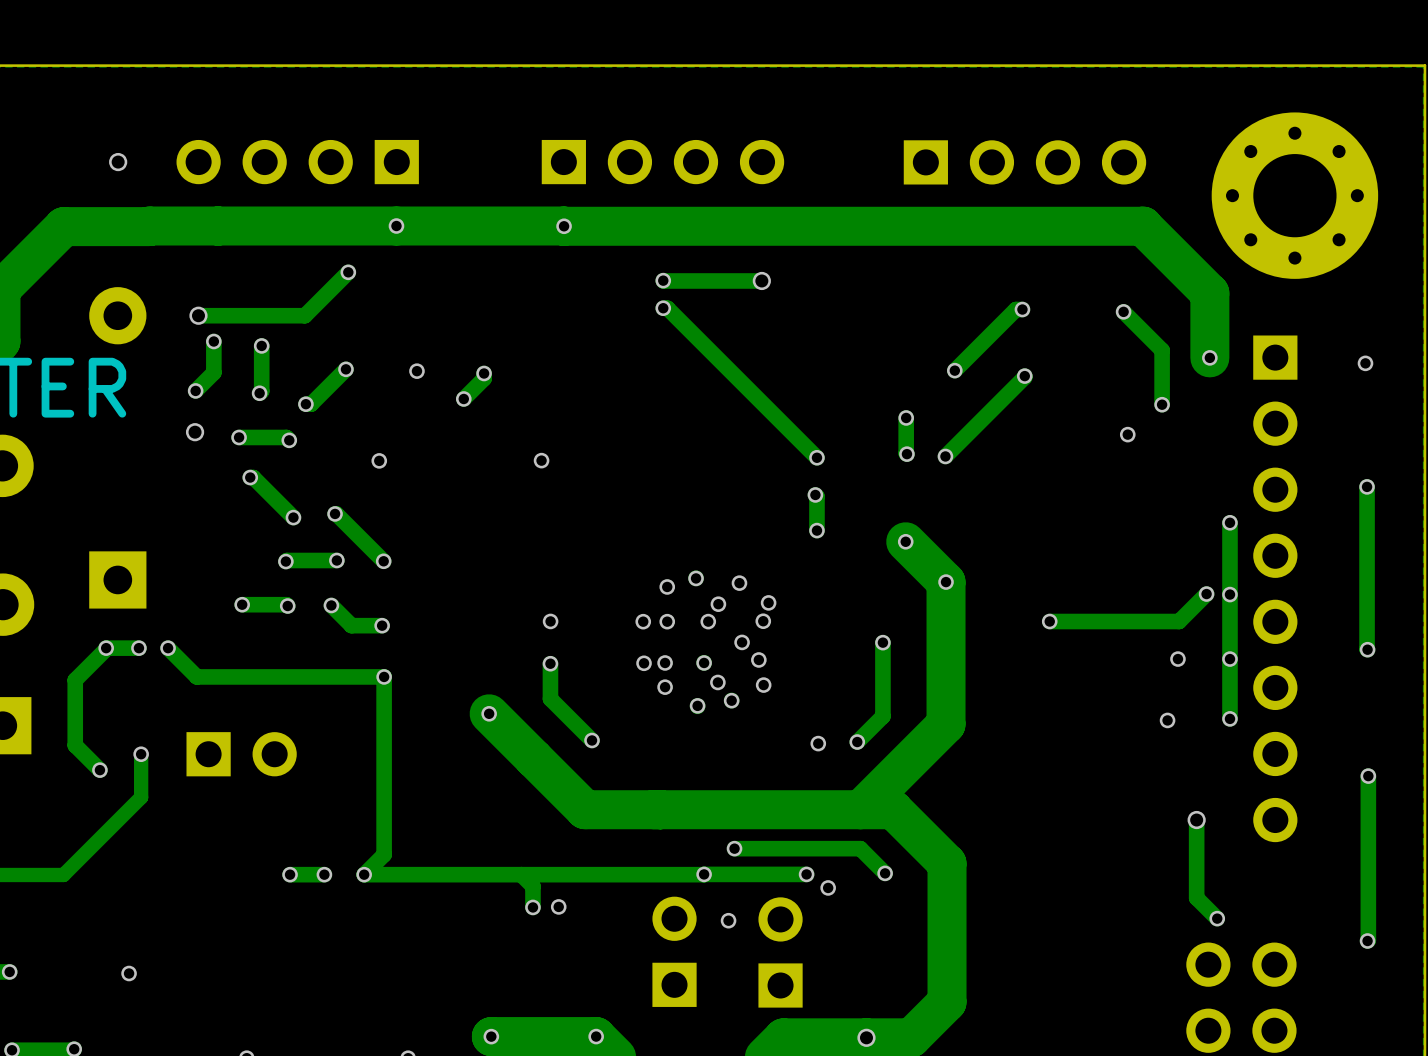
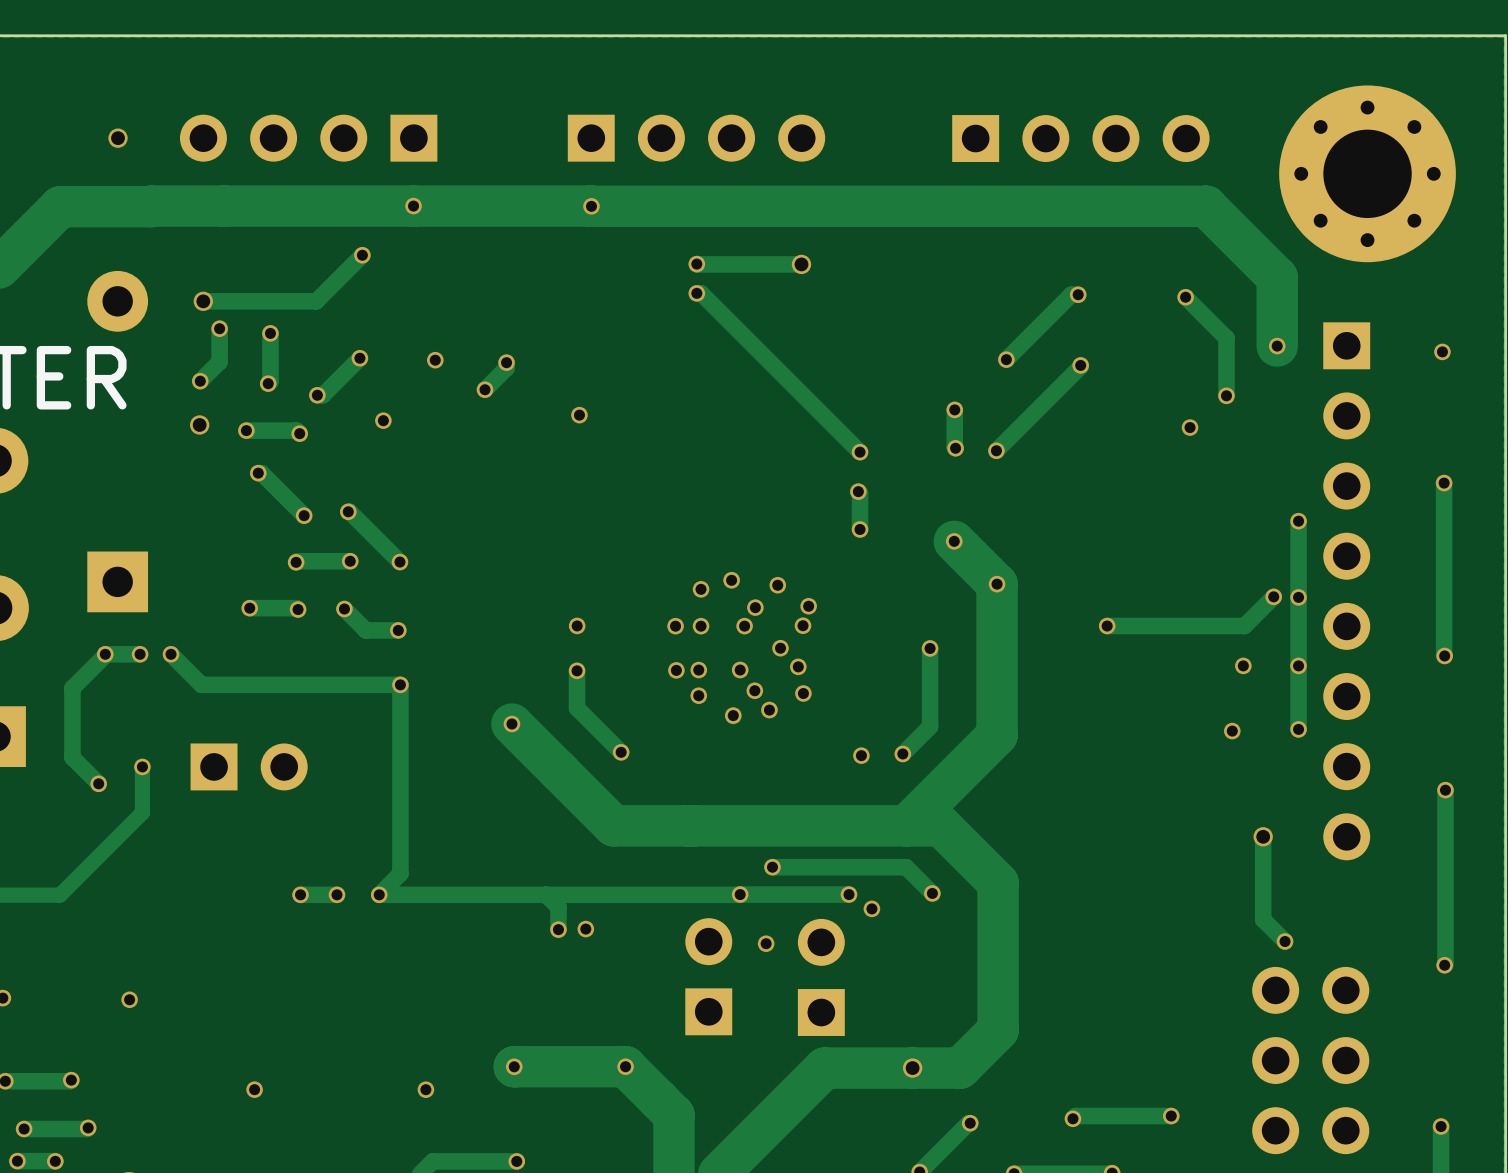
via position: (379, 460) -> (383, 420)
via position: (541, 460) -> (579, 415)

